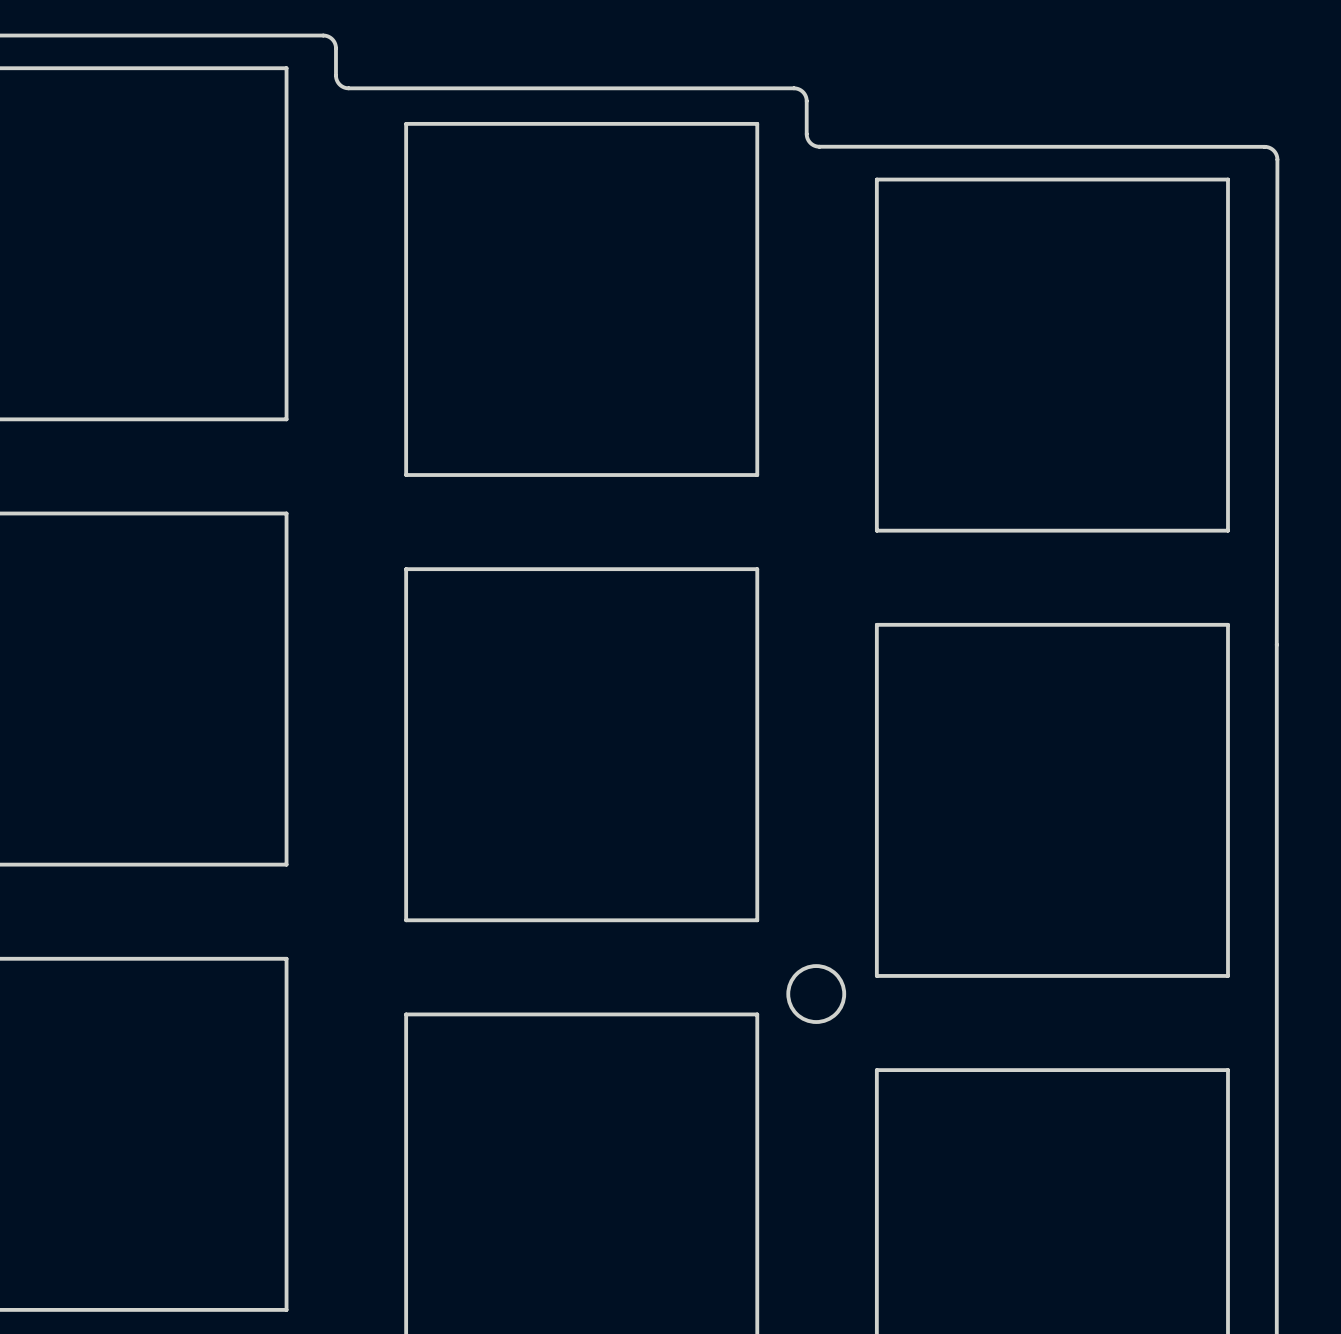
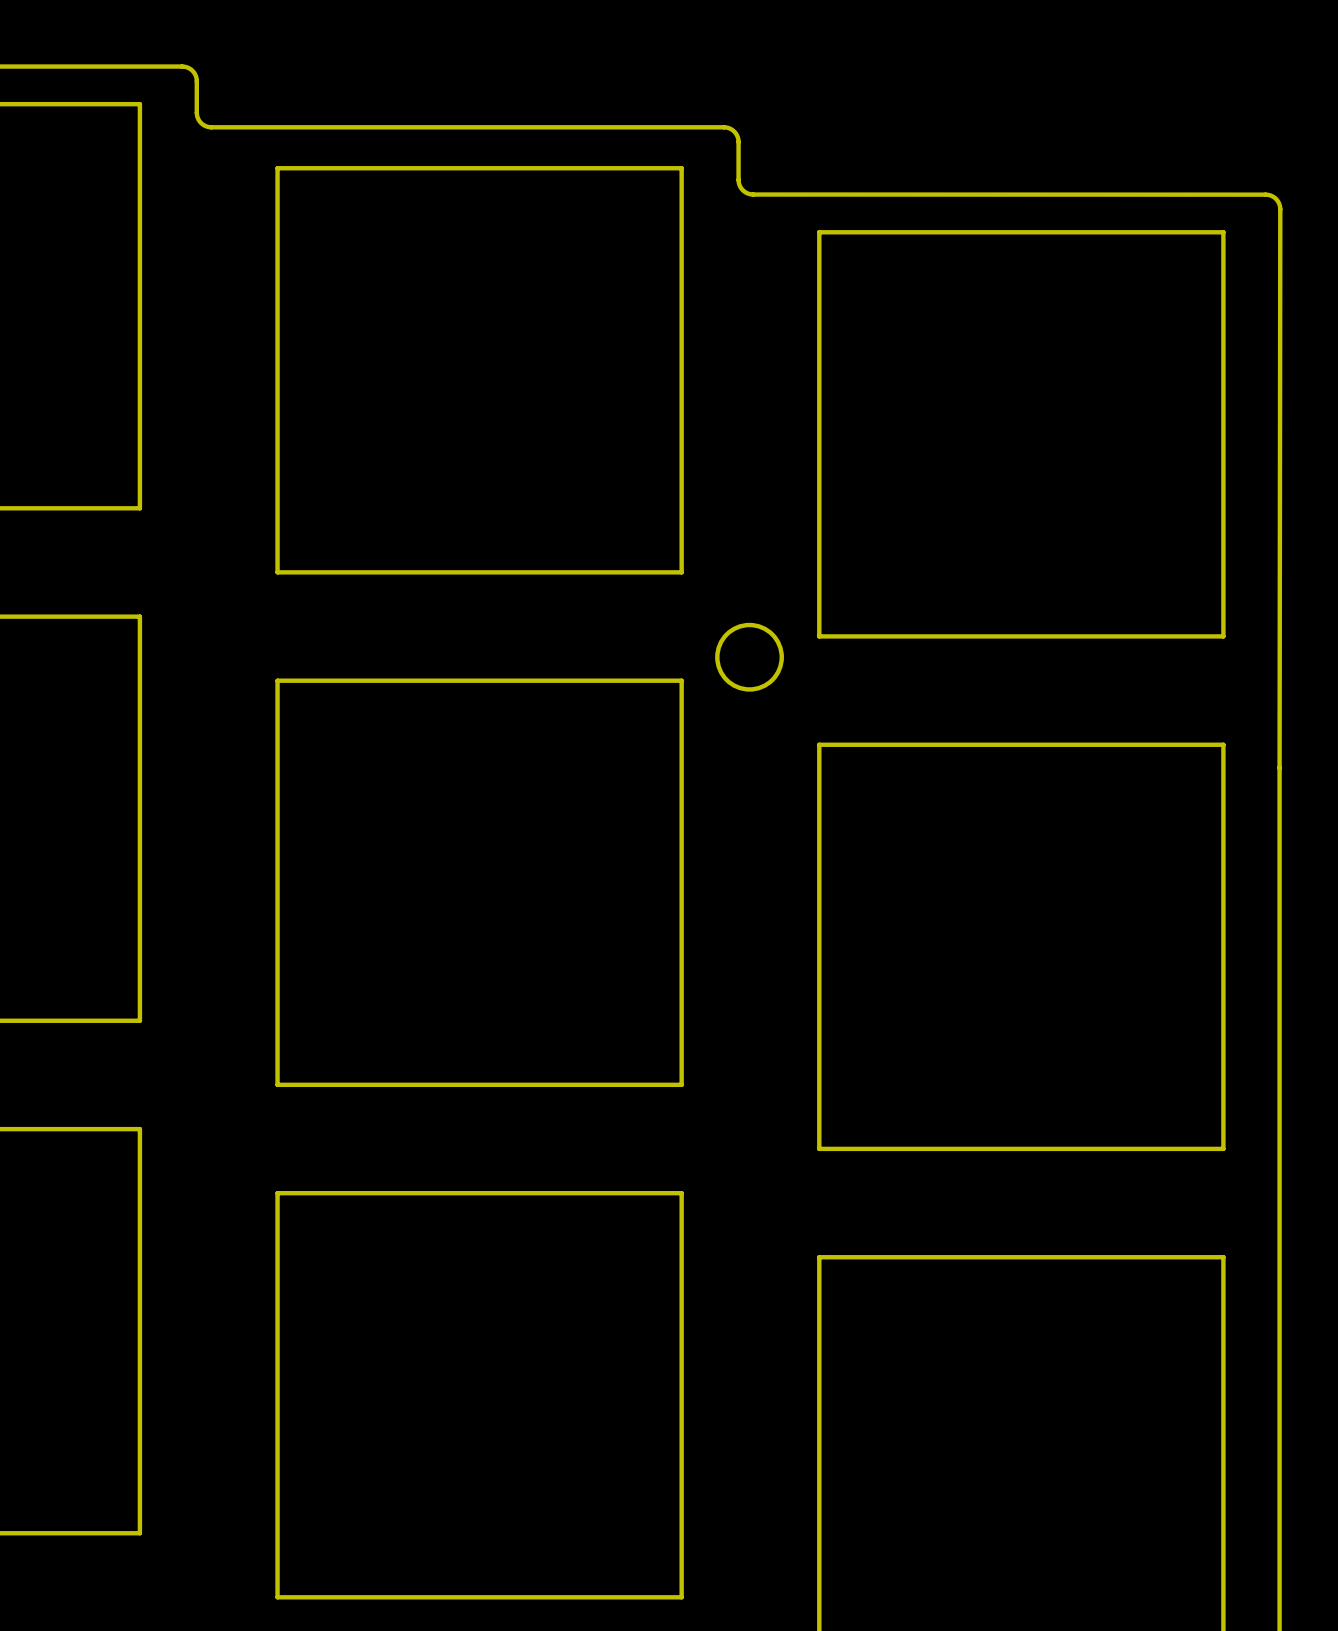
round board edge position: (816, 994) -> (749, 657)

